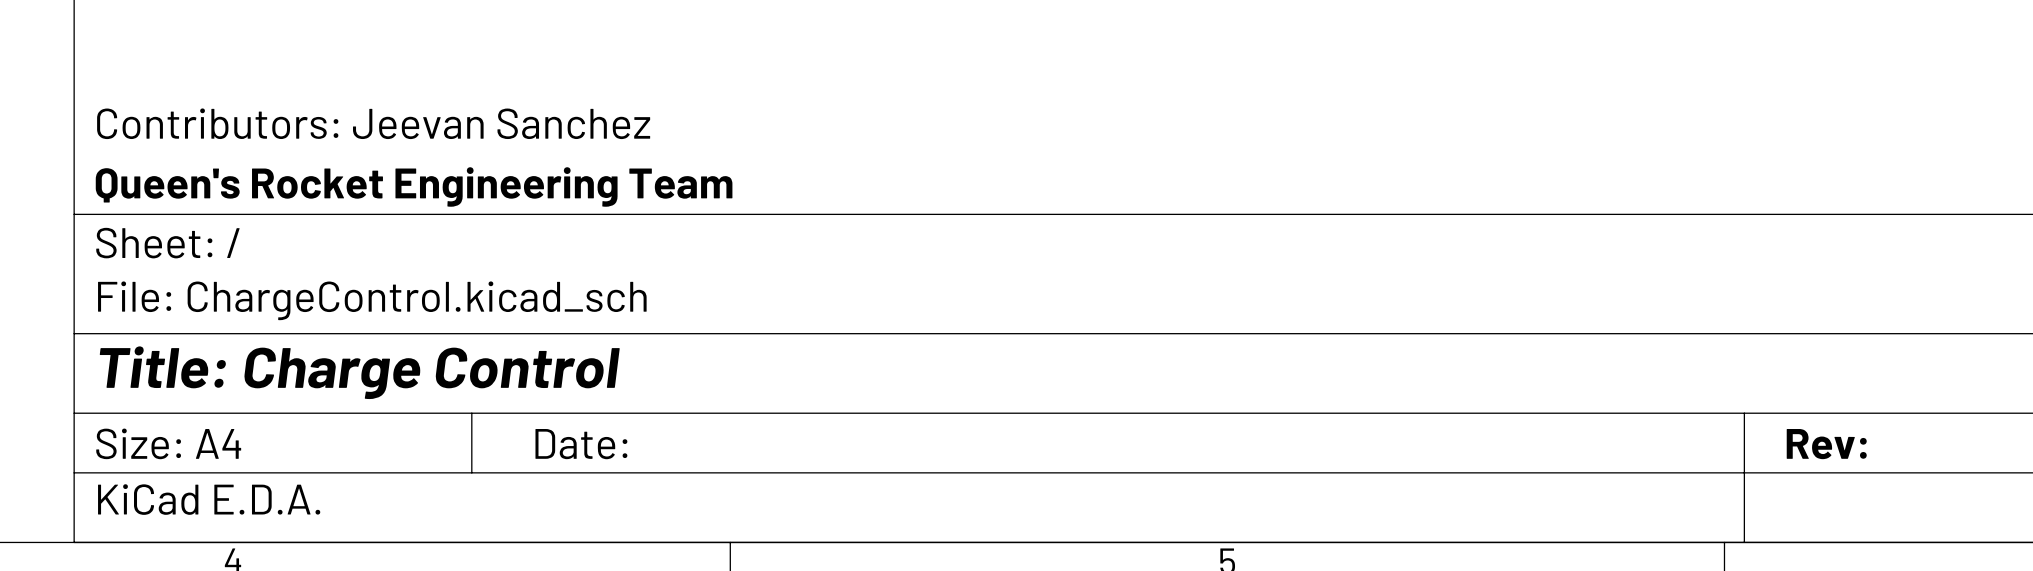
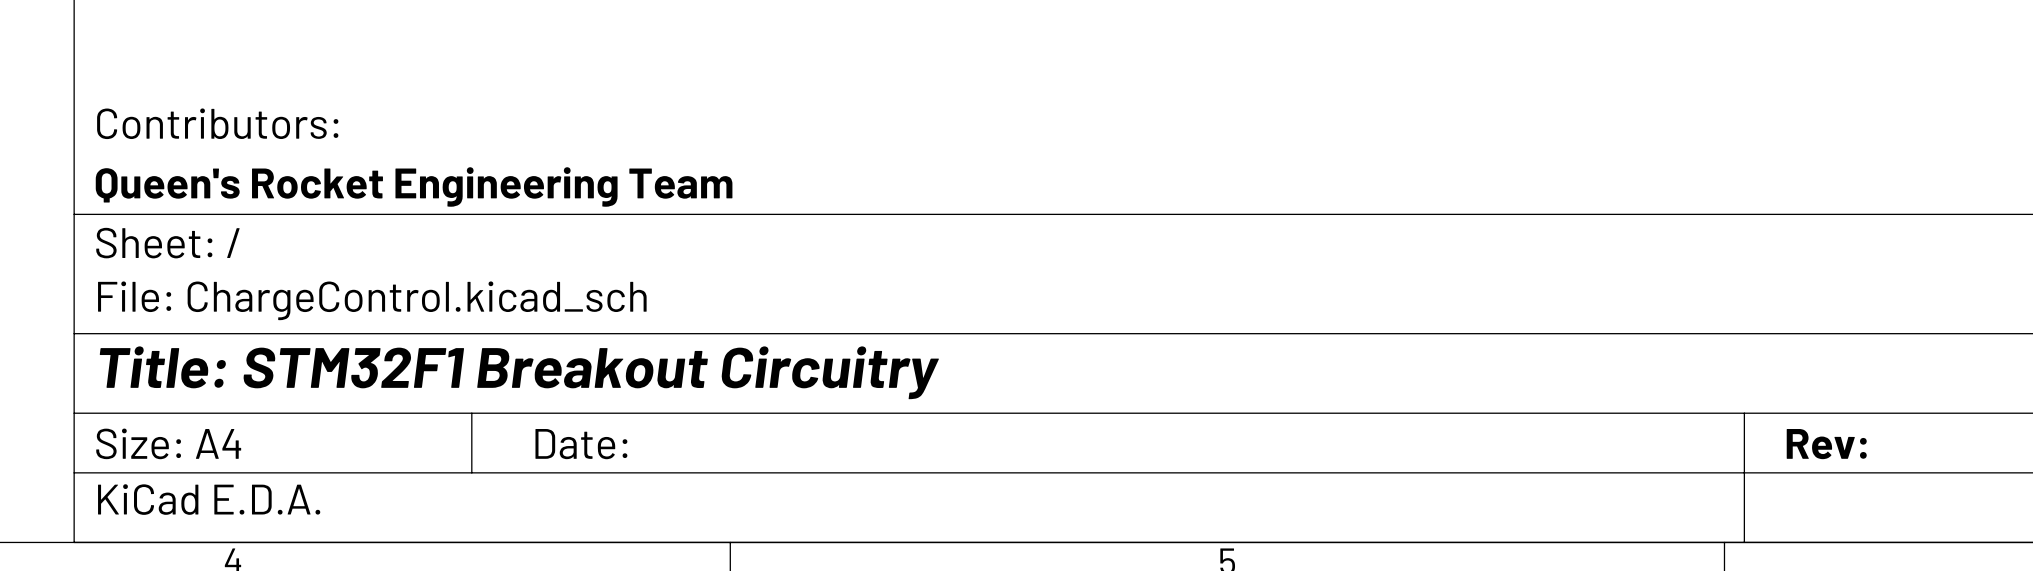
title block: Contributors: Jeevan Sanchez (373, 123) -> Contributors: (217, 123)
title block: Title: Charge Control (359, 372) -> Title: STM32F1 Breakout Circuitry (519, 372)

